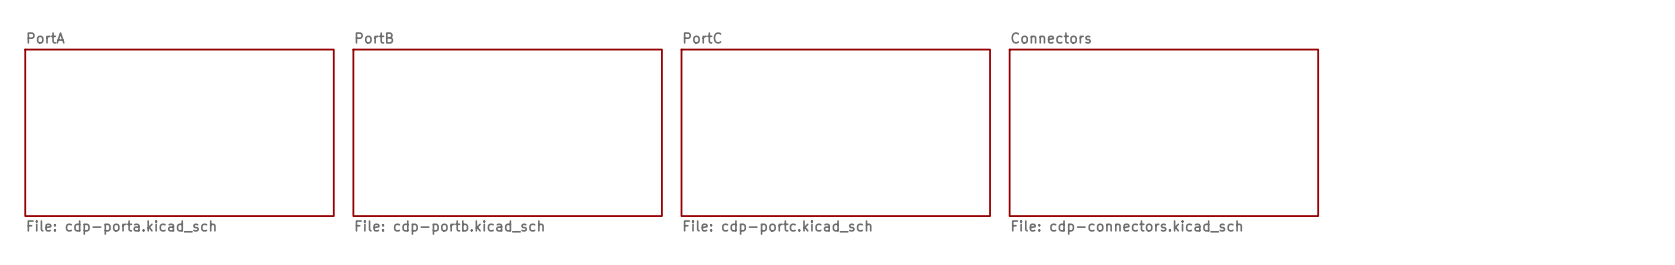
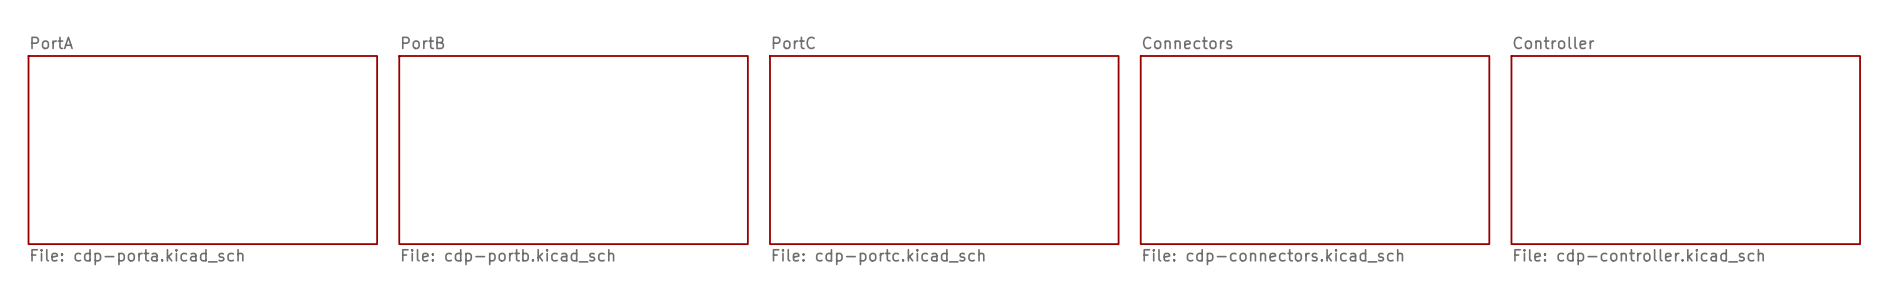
sheet Controller: none -> File: cdp-controller.kicad_sch (1685, 150)

